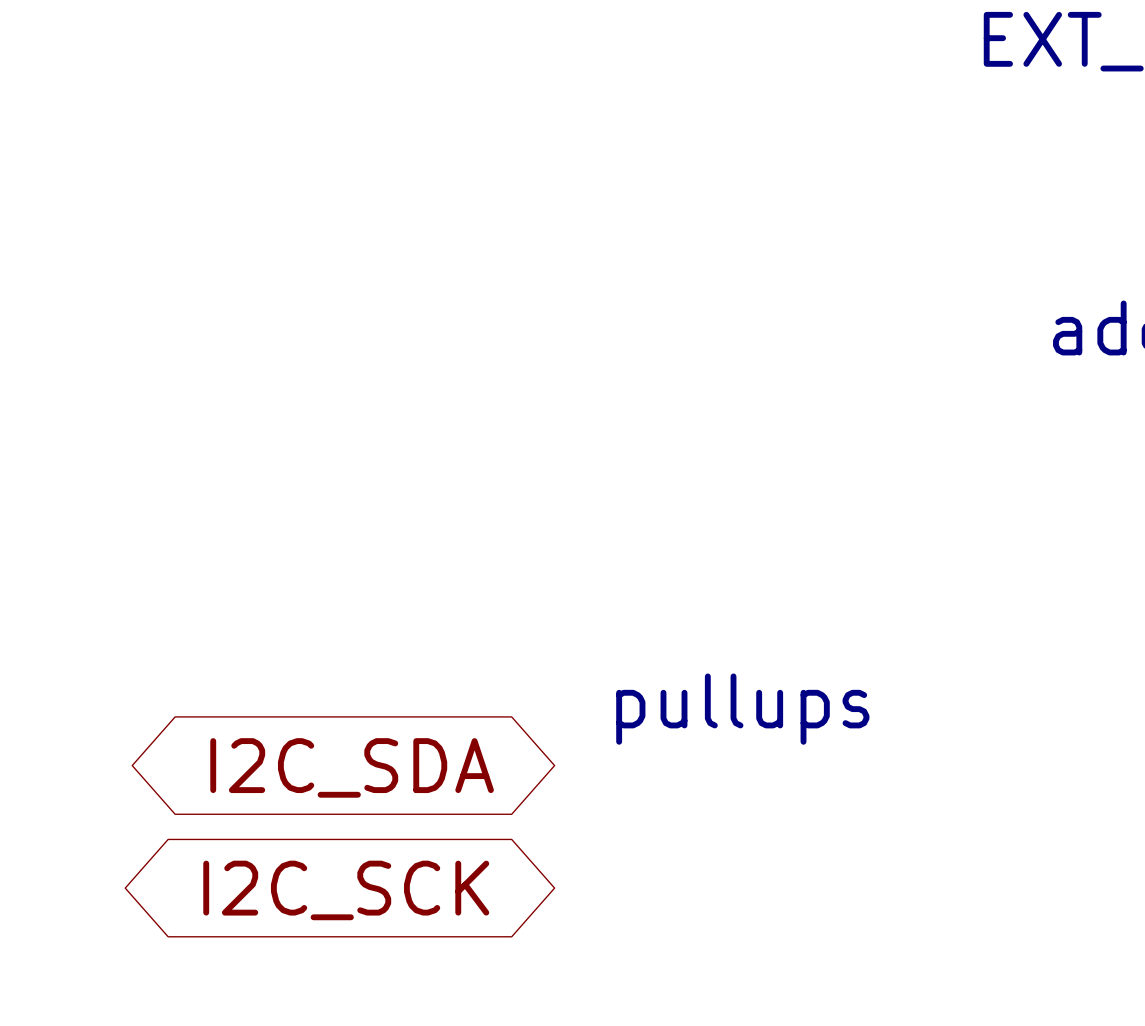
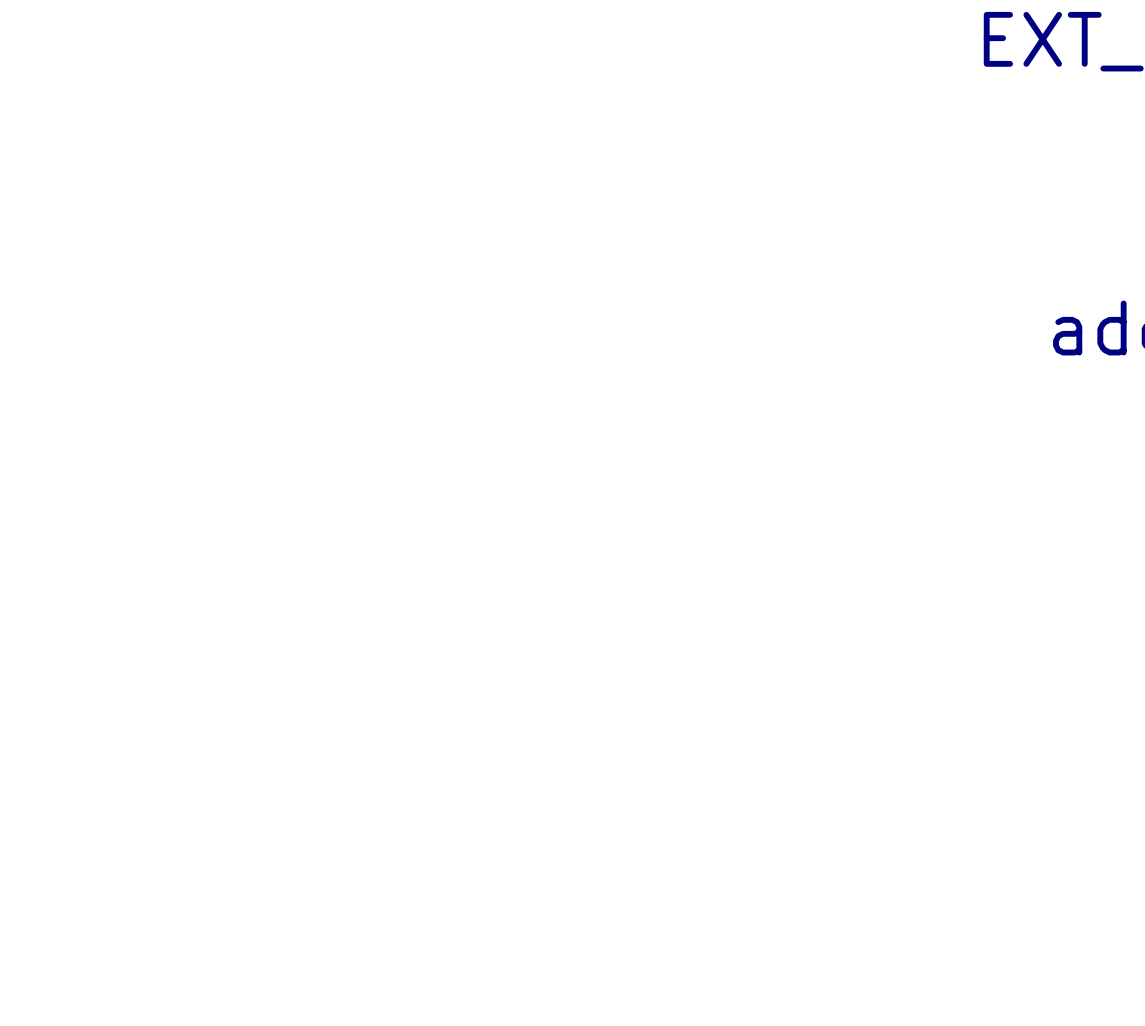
text: pullups (742, 709) -> none
global label: I2C_SDA (352, 767) -> none
global label: I2C_SCK (346, 890) -> none

